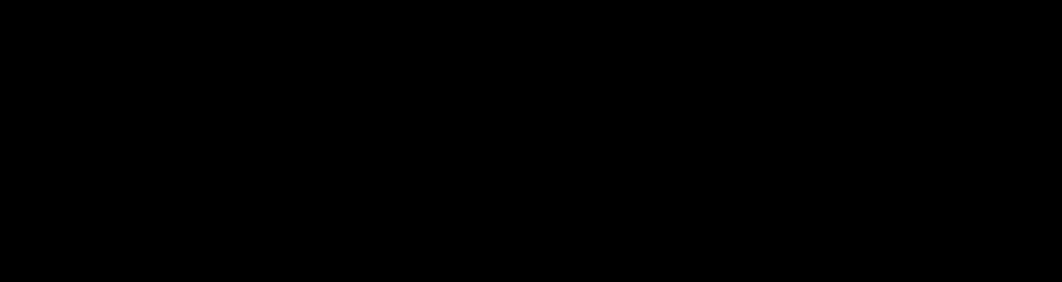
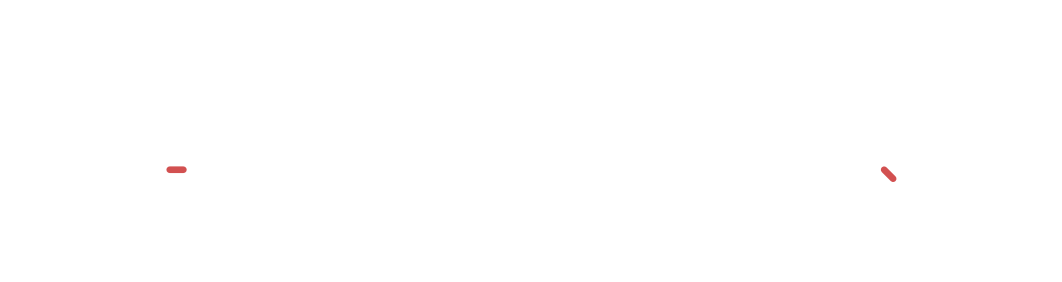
top track: none -> (183, 169) (169, 169)
top track: none -> (884, 169) (893, 178)

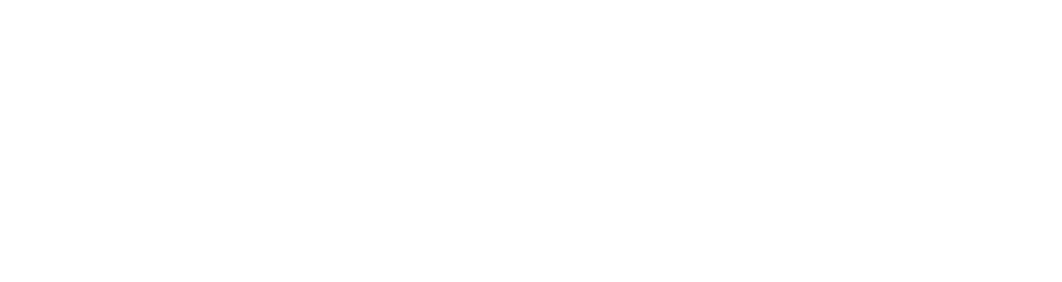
top track: (183, 169) (169, 169) -> none
top track: (884, 169) (893, 178) -> none

